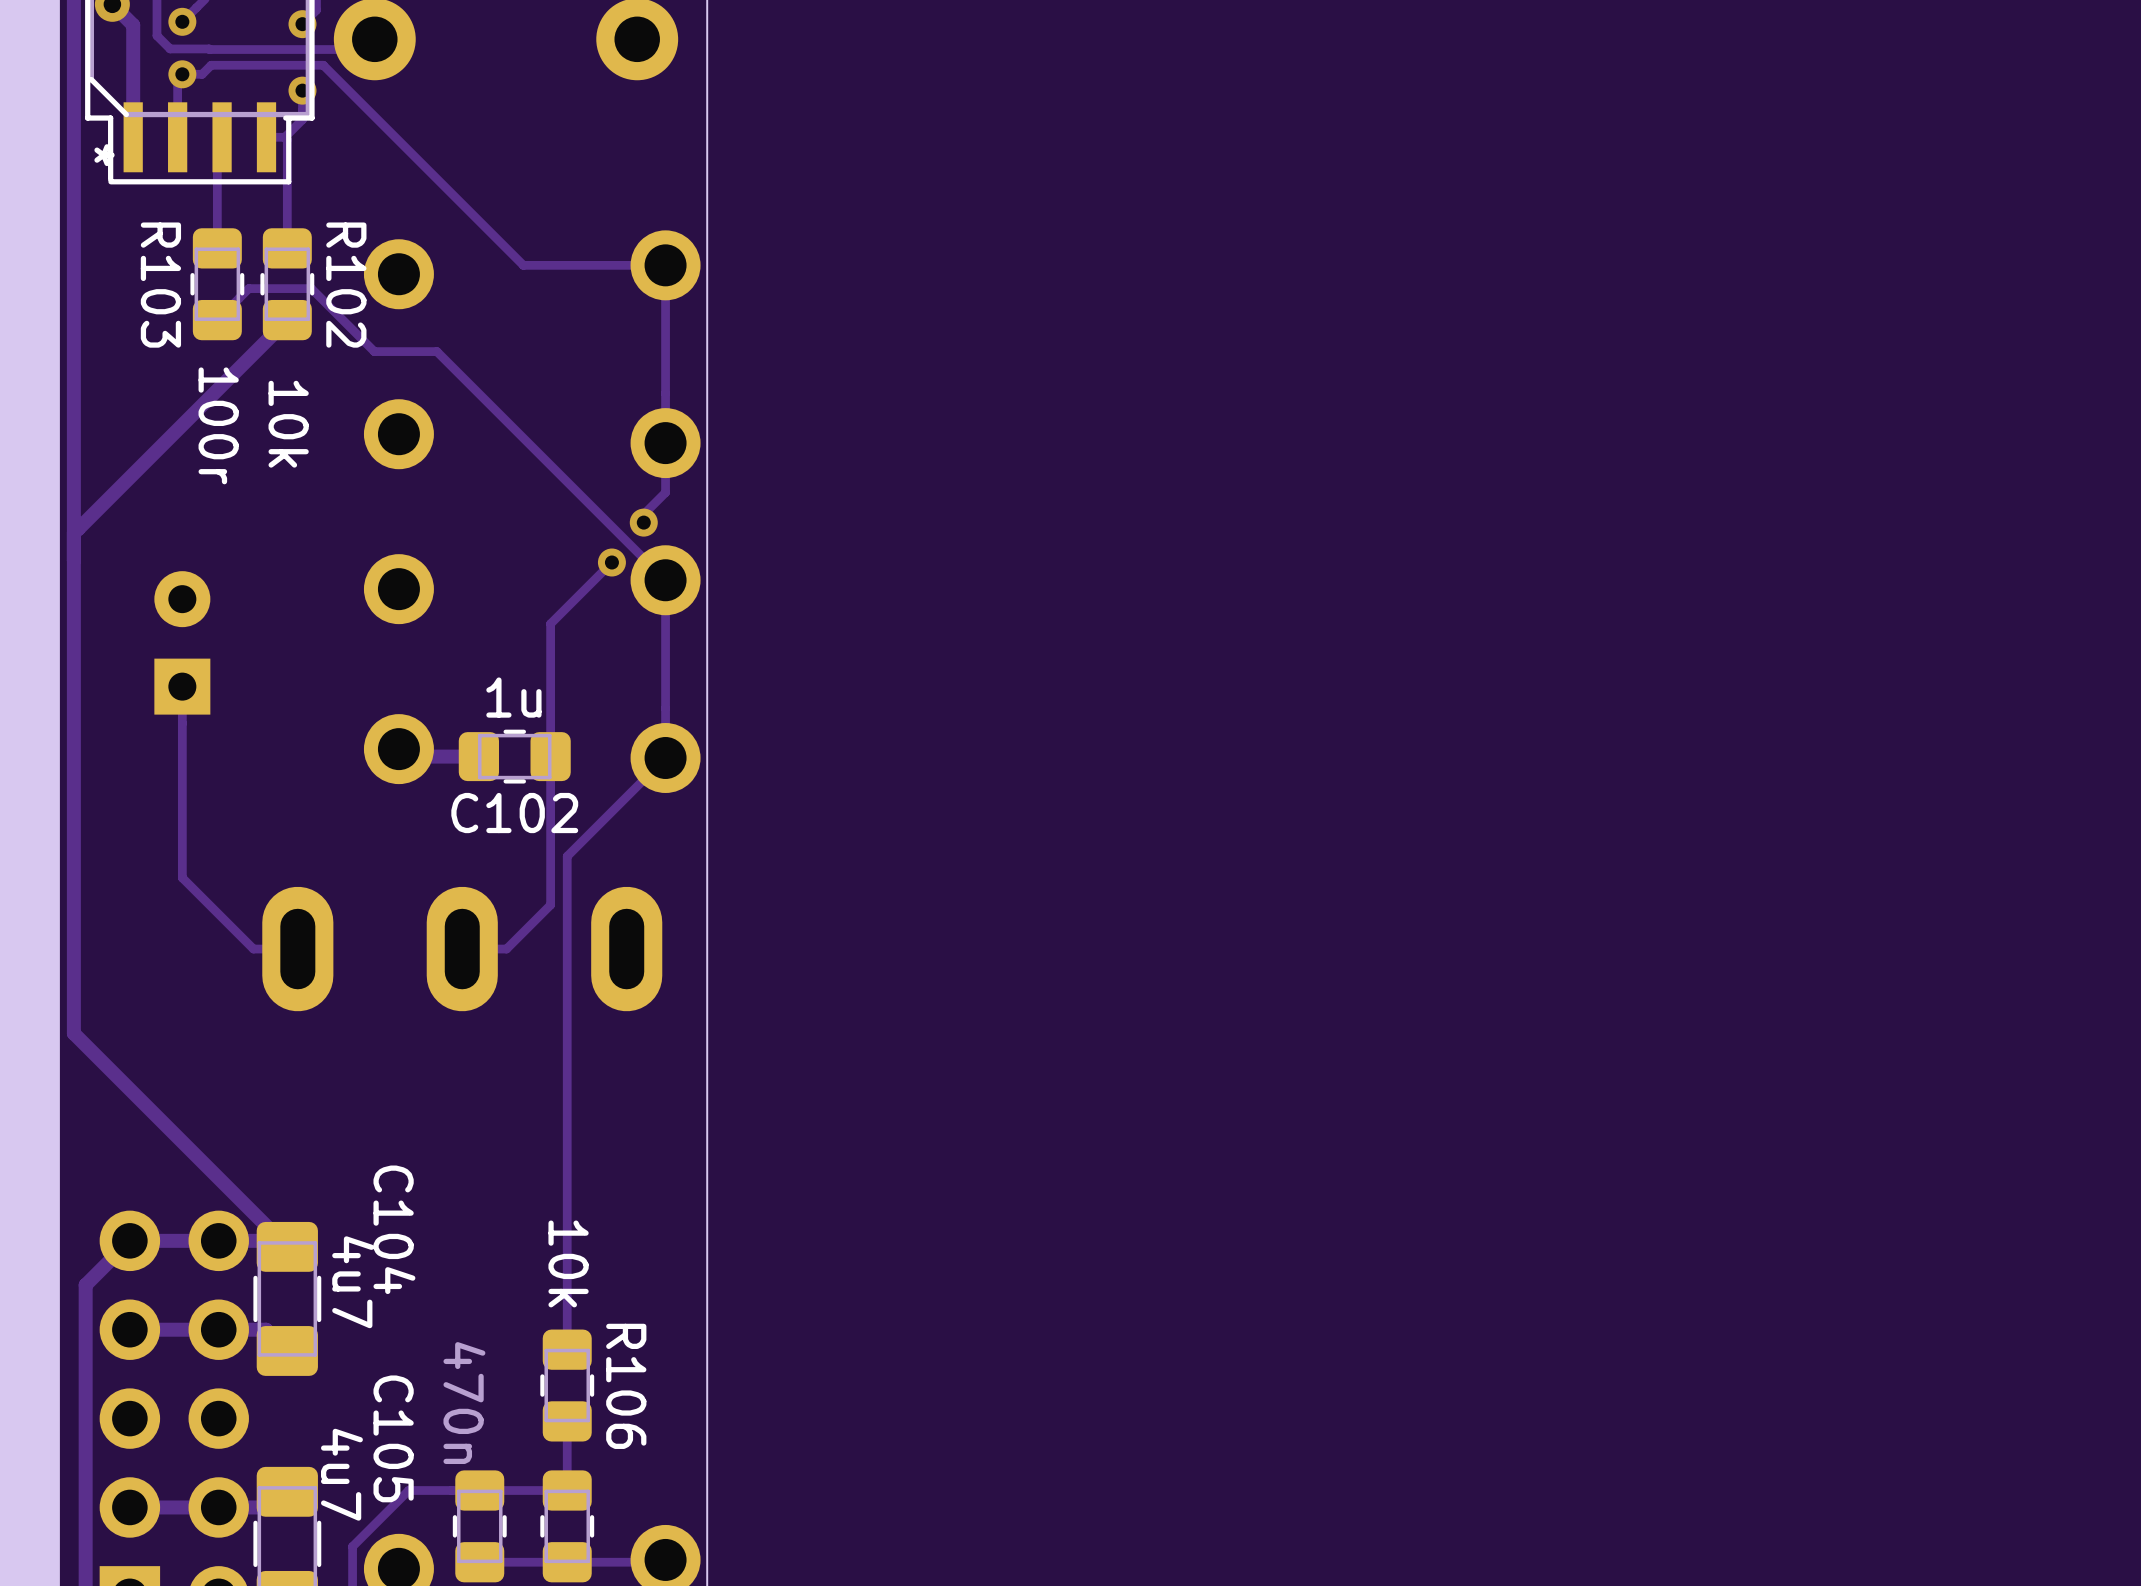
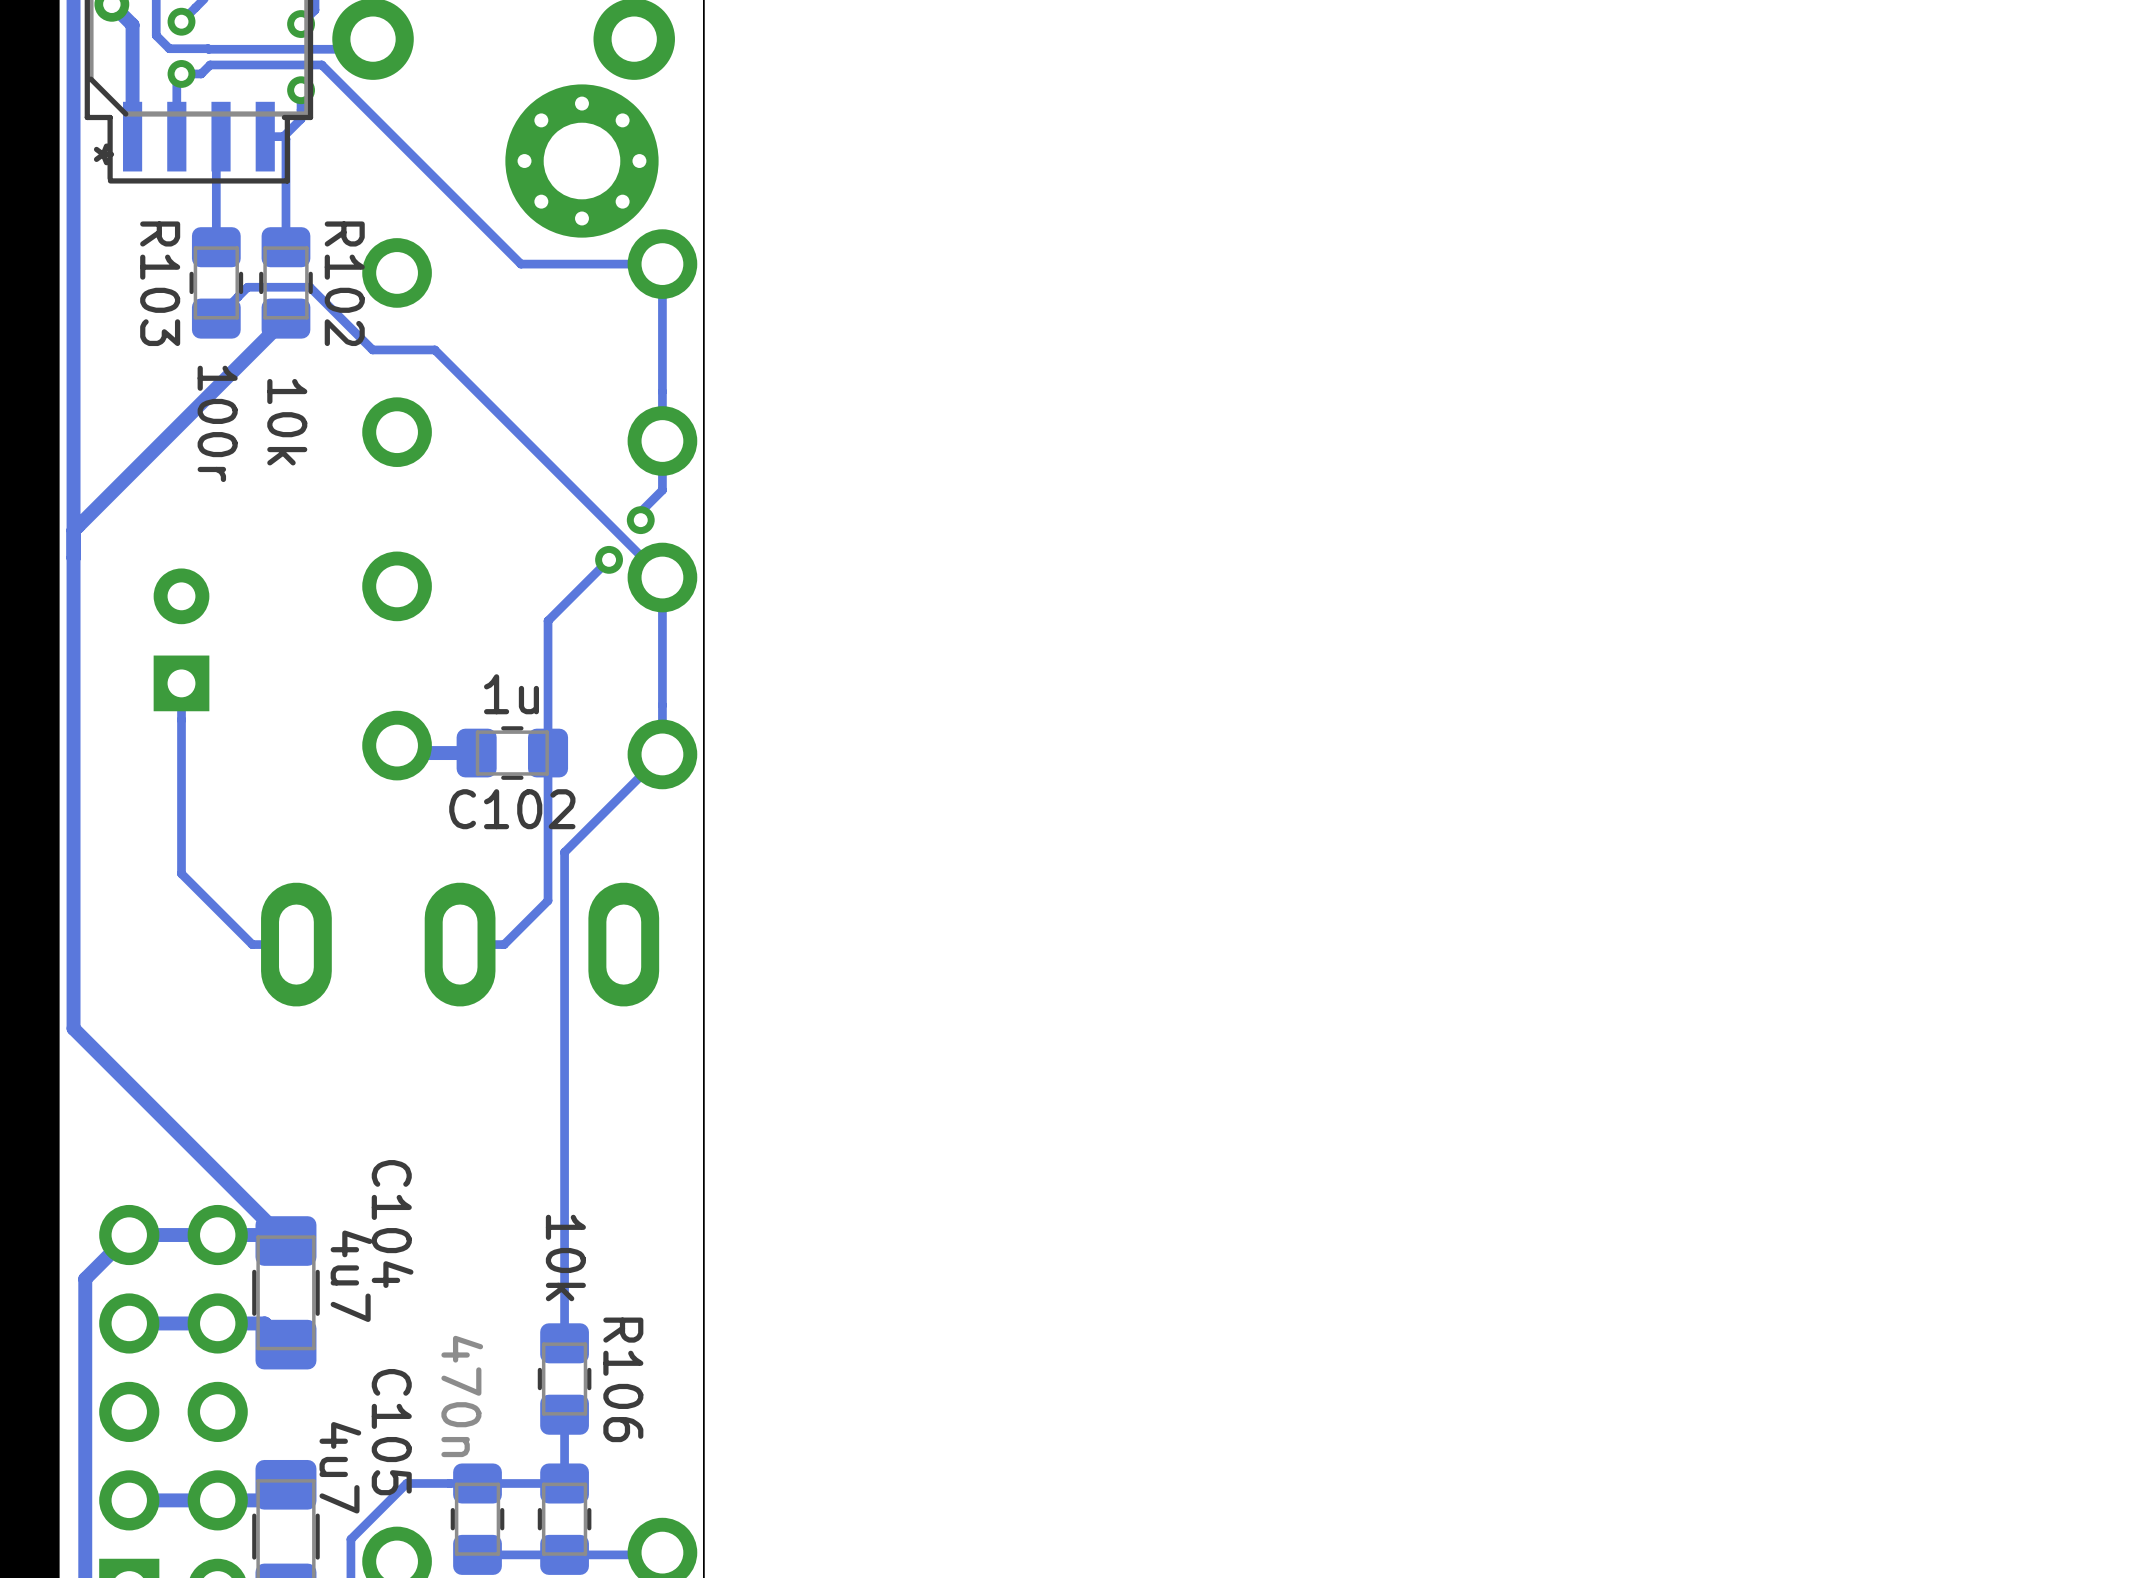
part: none -> (581, 161)

